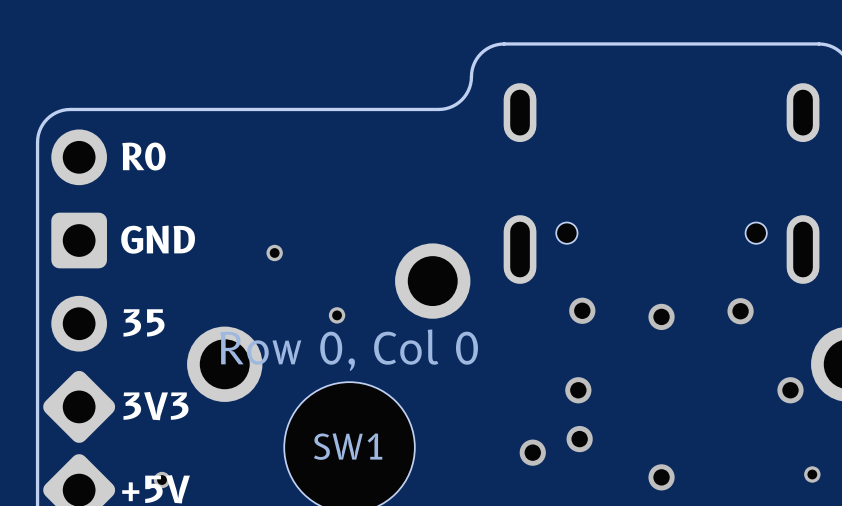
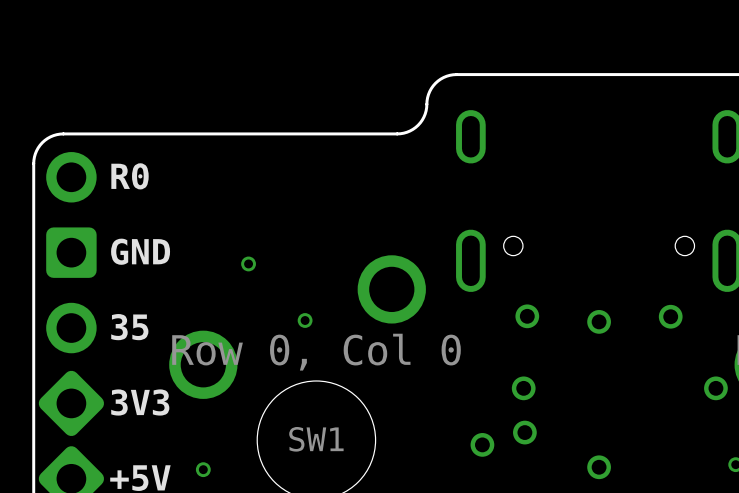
via: (162, 480) -> none
via: none -> (203, 469)

